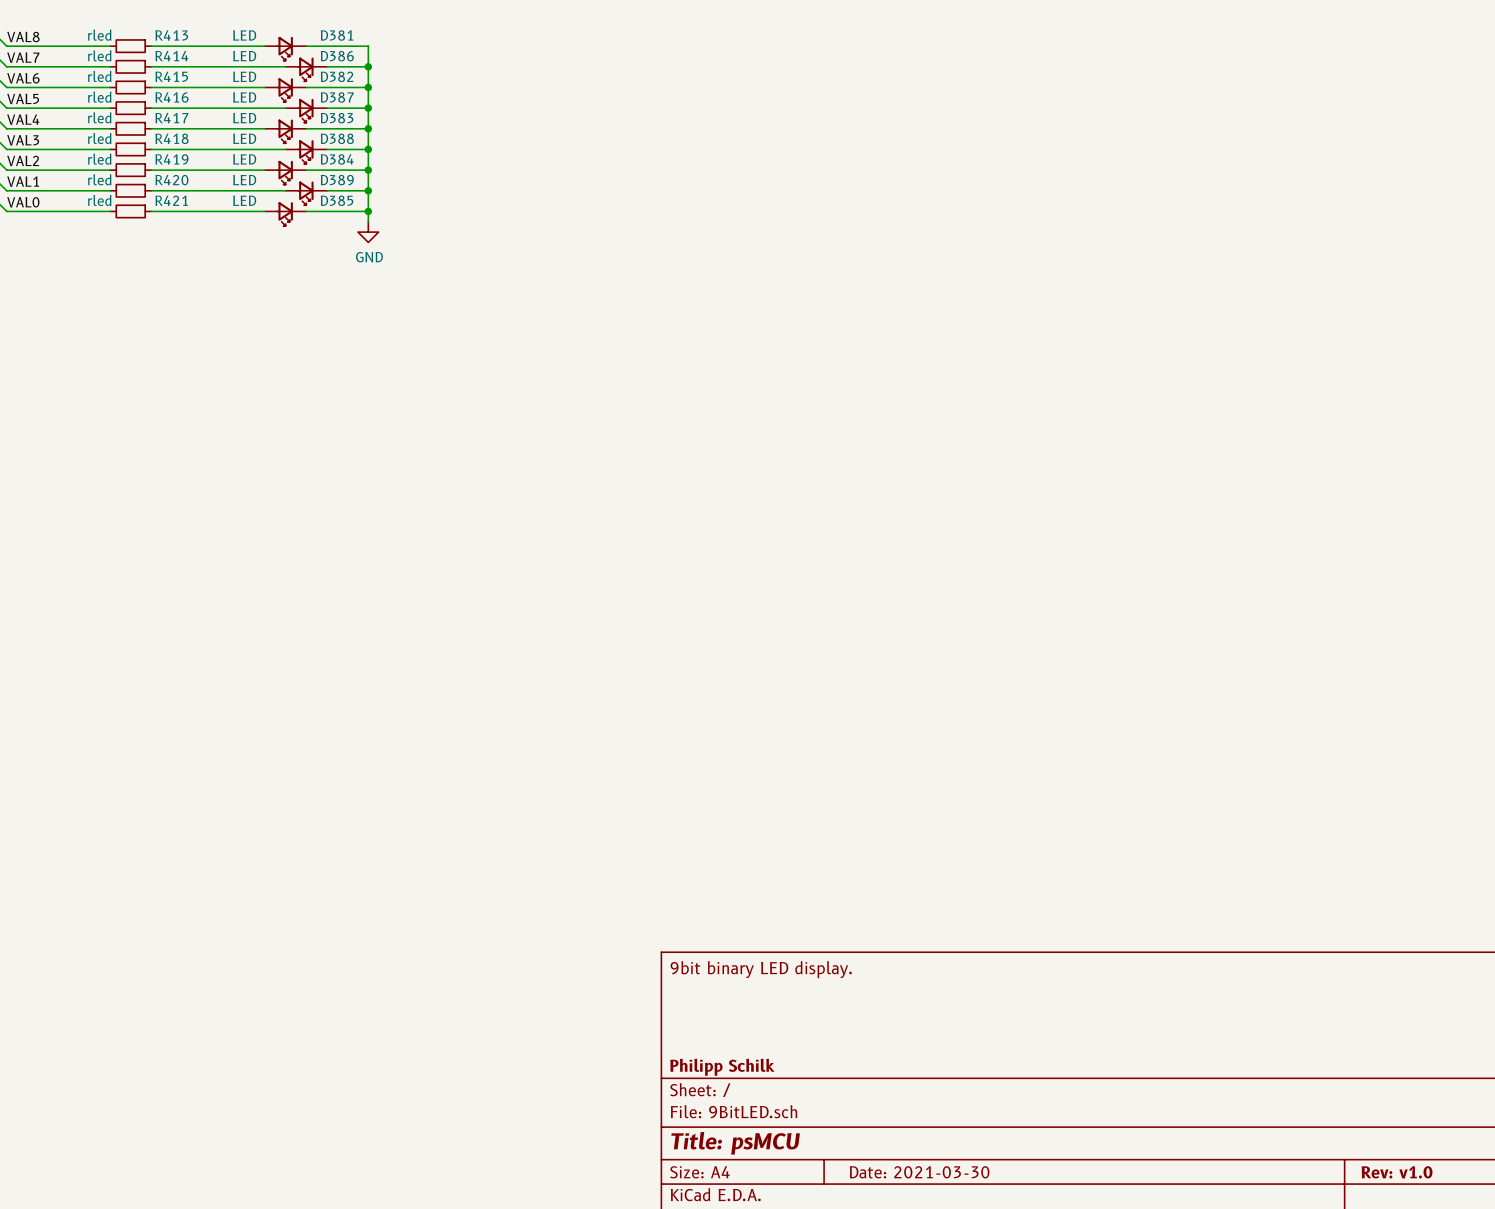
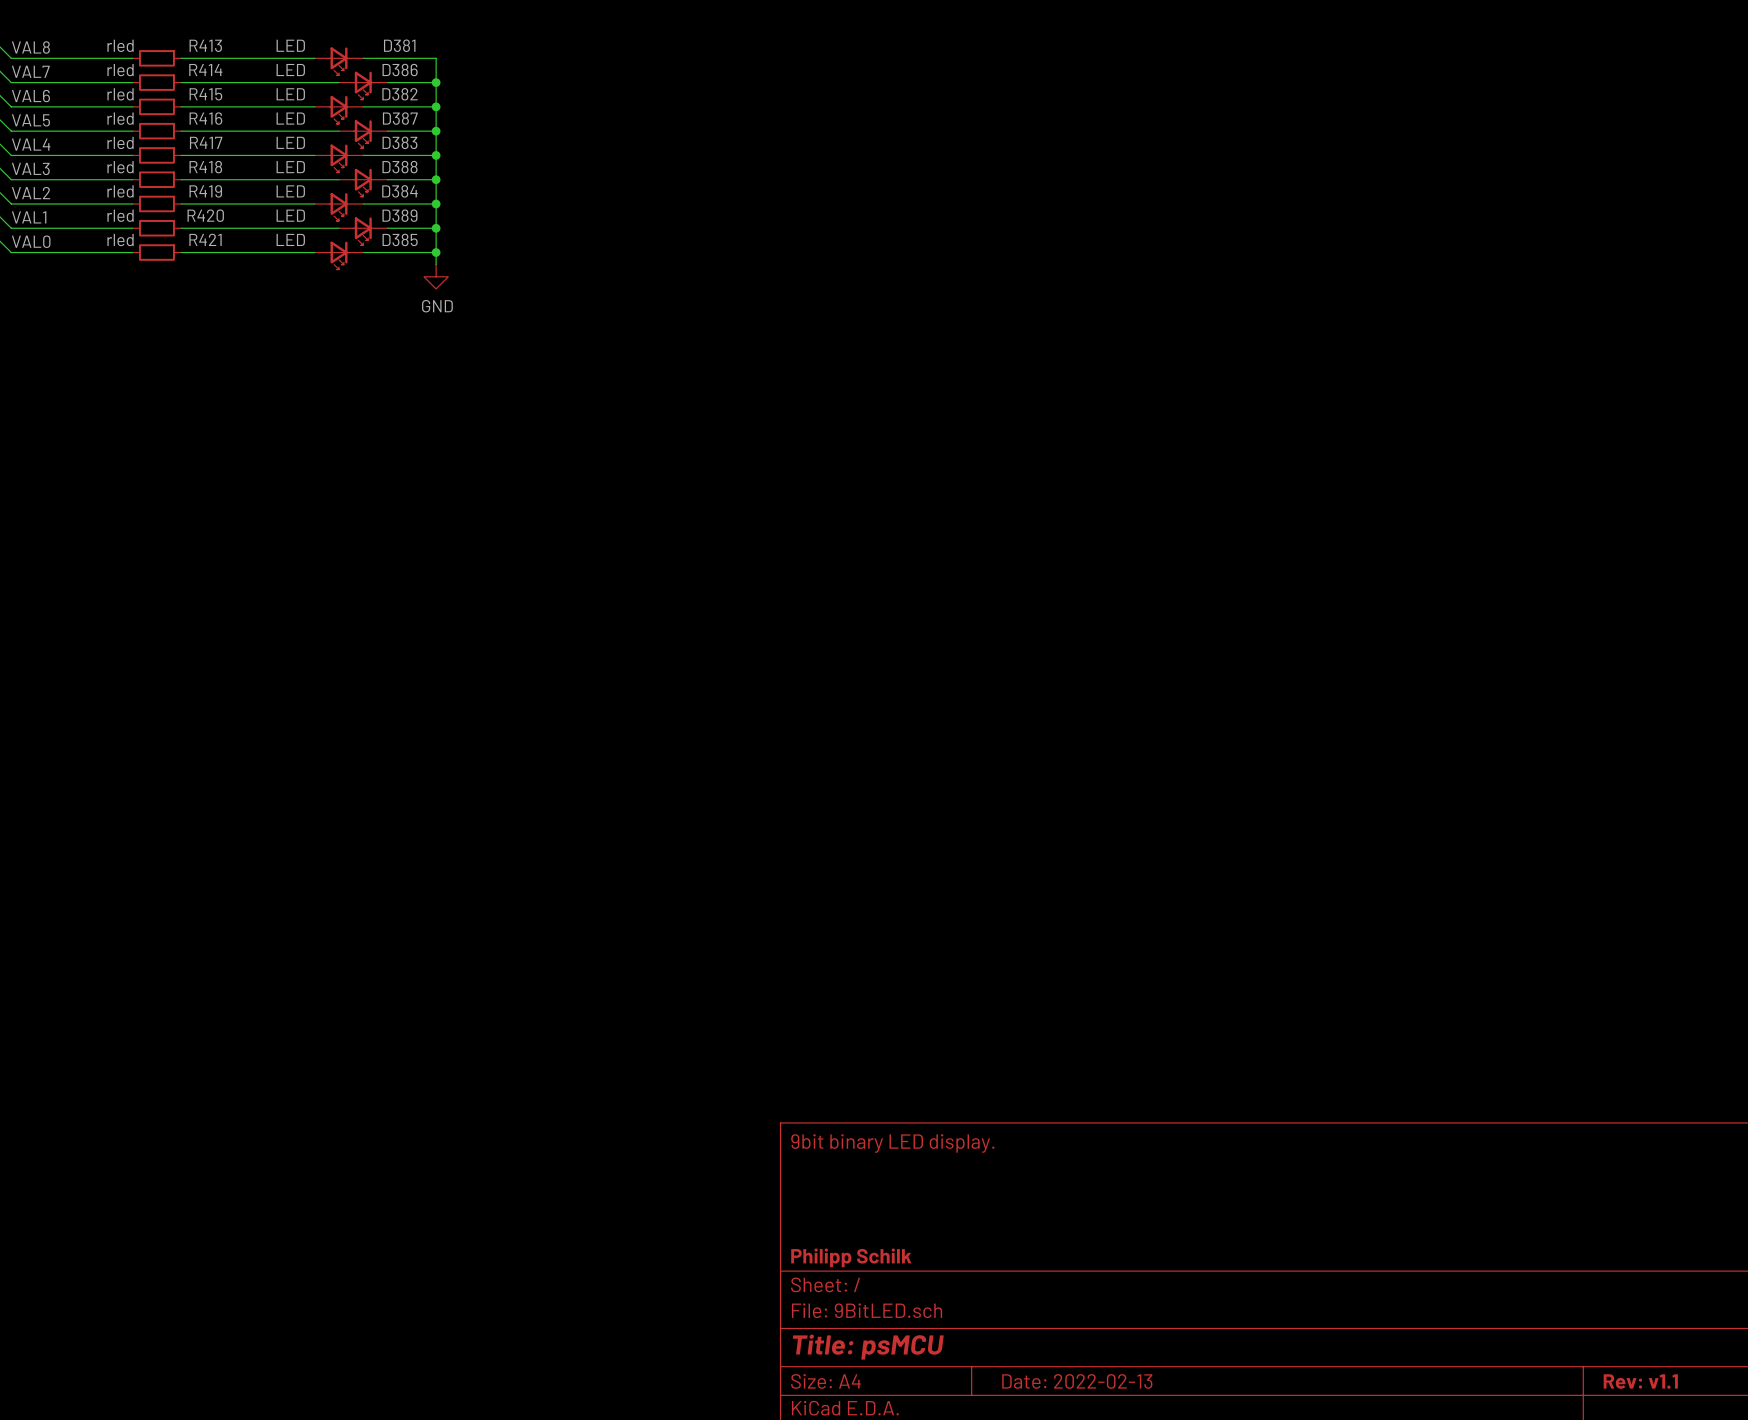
title block: Date: 2021-03-30 (919, 1172) -> Date: 2022-02-13 (1077, 1381)
title block: Rev: v1.0 (1397, 1172) -> Rev: v1.1 (1640, 1381)

